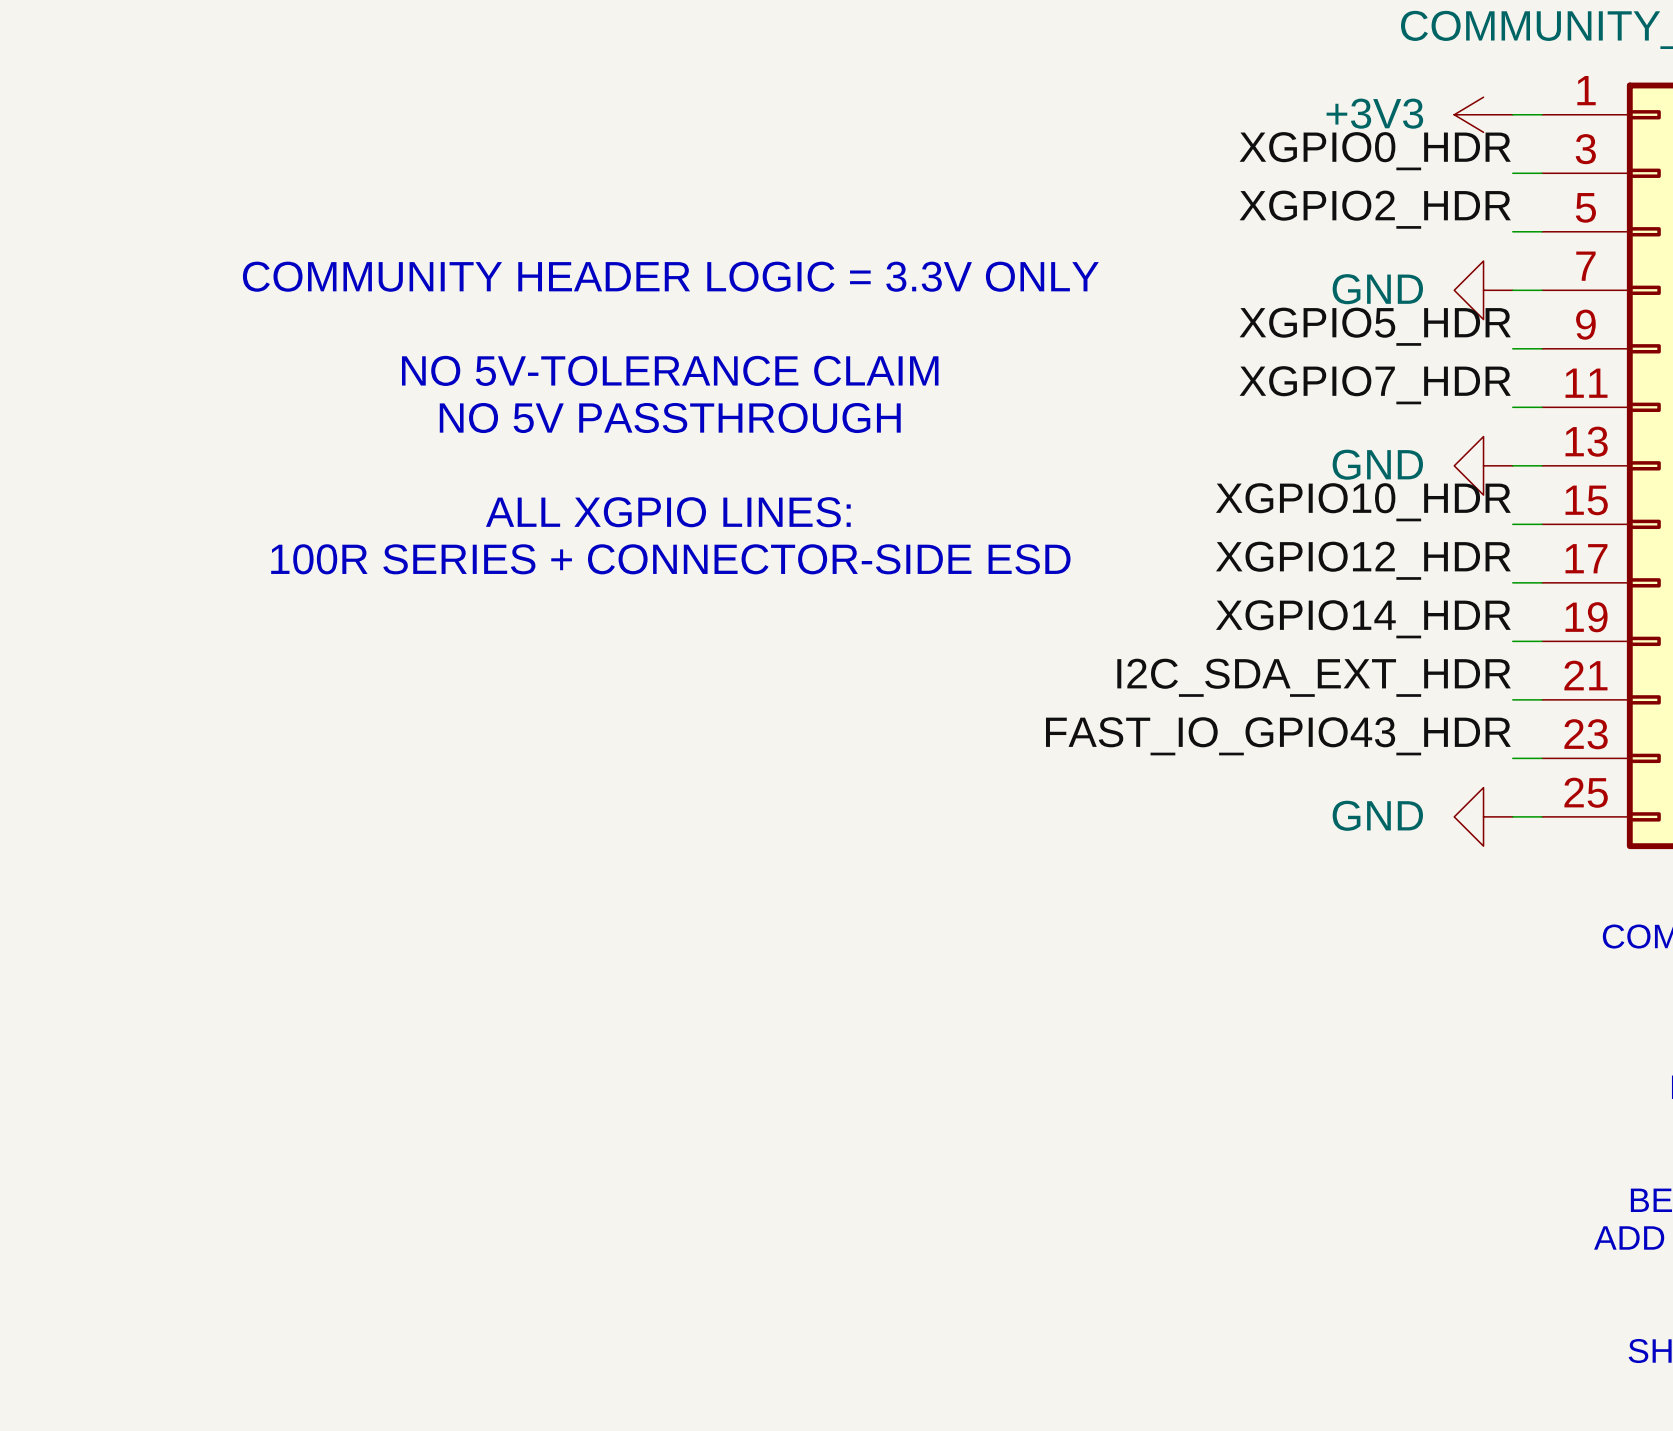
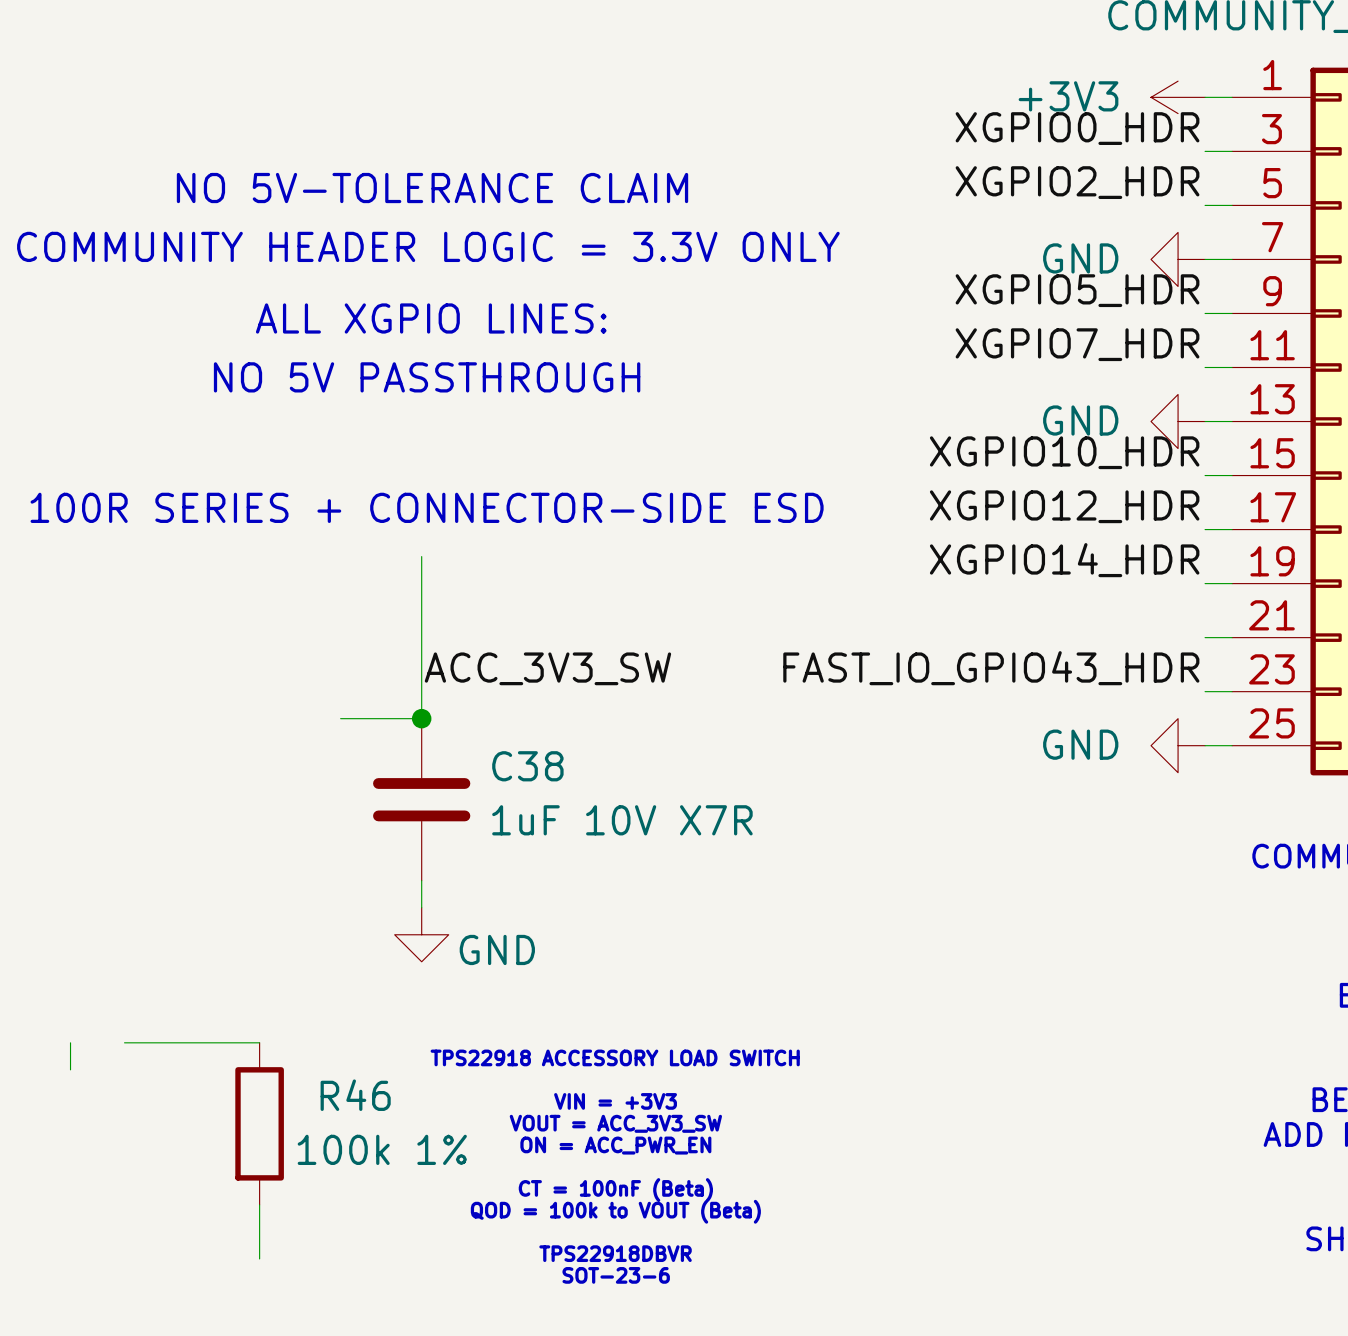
text position: NO 5V-TOLERANCE CLAIM (670, 370) -> NO 5V-TOLERANCE CLAIM (432, 188)
text position: ALL XGPIO LINES: (668, 512) -> ALL XGPIO LINES: (431, 318)
wire: none -> (421, 556) (421, 718) (340, 718)
label: I2C_SDA_EXT_HDR (1314, 677) -> none
label: none -> ACC_3V3_SW (547, 668)
junction: none -> (421, 718)
C38: none -> 1uF 10V X7R (421, 799)
wire: none -> (421, 880) (421, 907)
power symbol: none -> GND (421, 934)
wire: none -> (70, 1042) (70, 1069)
wire: none -> (124, 1042) (259, 1042)
text: none -> TPS22918 ACCESSORY LOAD SWITCH (615, 1057)
text: none -> VIN = +3V3 (615, 1101)
R46: none -> 100k 1% (259, 1123)
text: none -> VOUT = ACC_3V3_SW (615, 1123)
text: none -> ON = ACC_PWR_EN (615, 1145)
text: none -> CT = 100nF (Beta) (615, 1190)
wire: none -> (259, 1204) (259, 1258)
text: none -> QOD = 100k to VOUT (Beta) (615, 1211)
text: none -> TPS22918DBVR (615, 1253)
text: none -> SOT-23-6 (616, 1275)

